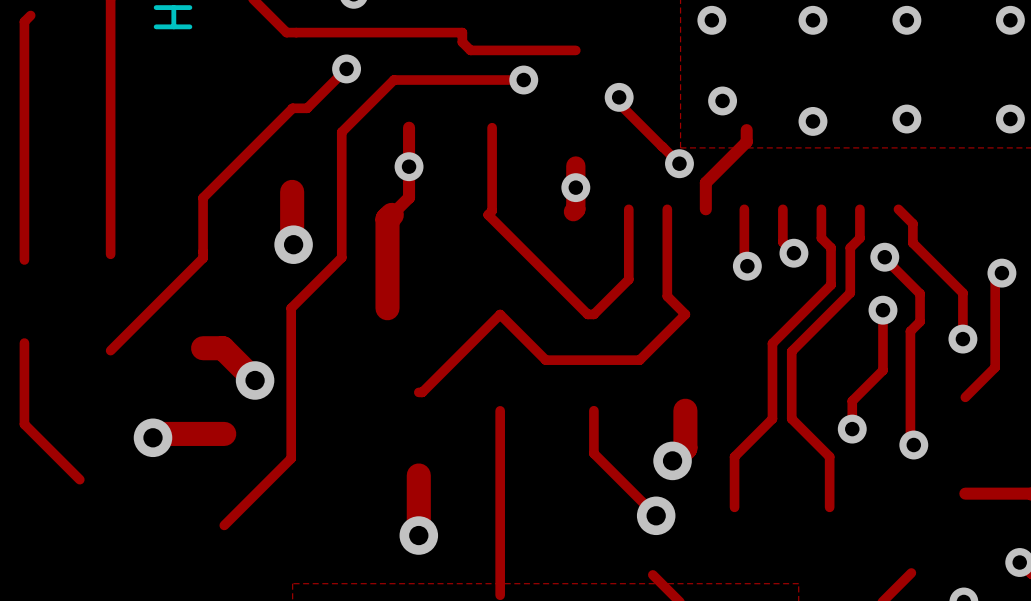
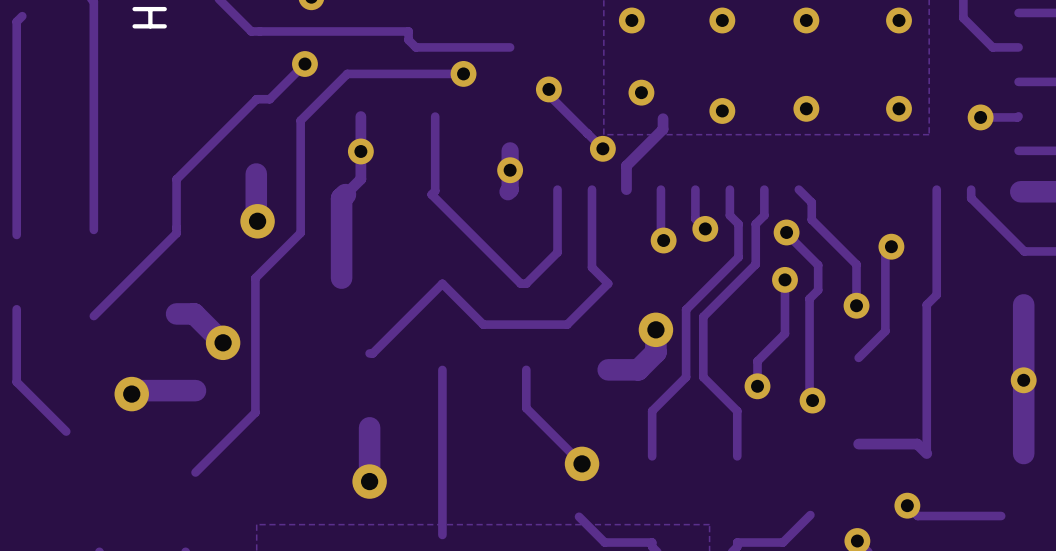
track: (685, 410) (685, 448) (672, 460) -> (608, 369) (638, 369) (655, 352) (655, 329)
via position: (672, 460) -> (655, 329)

